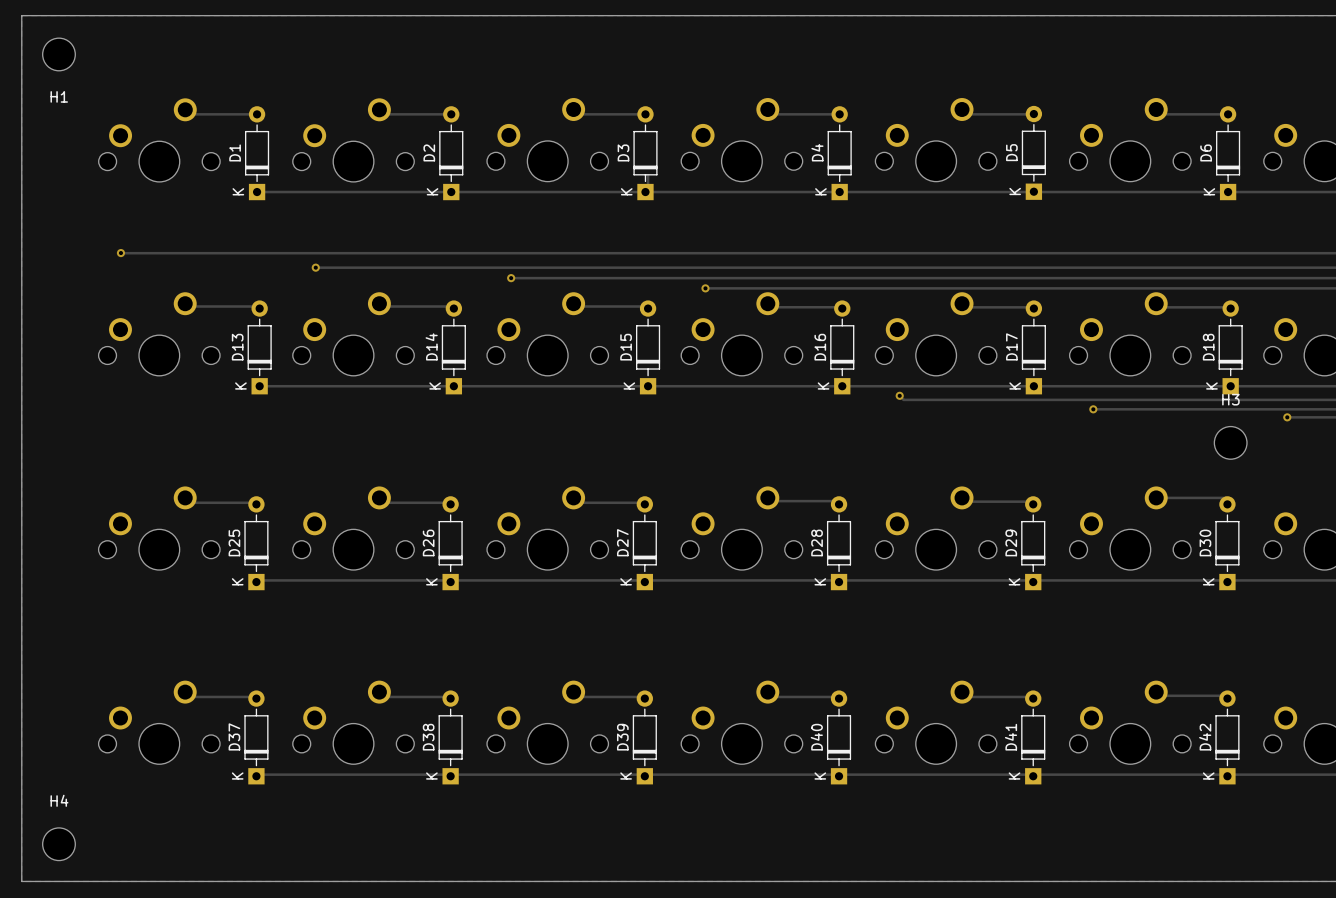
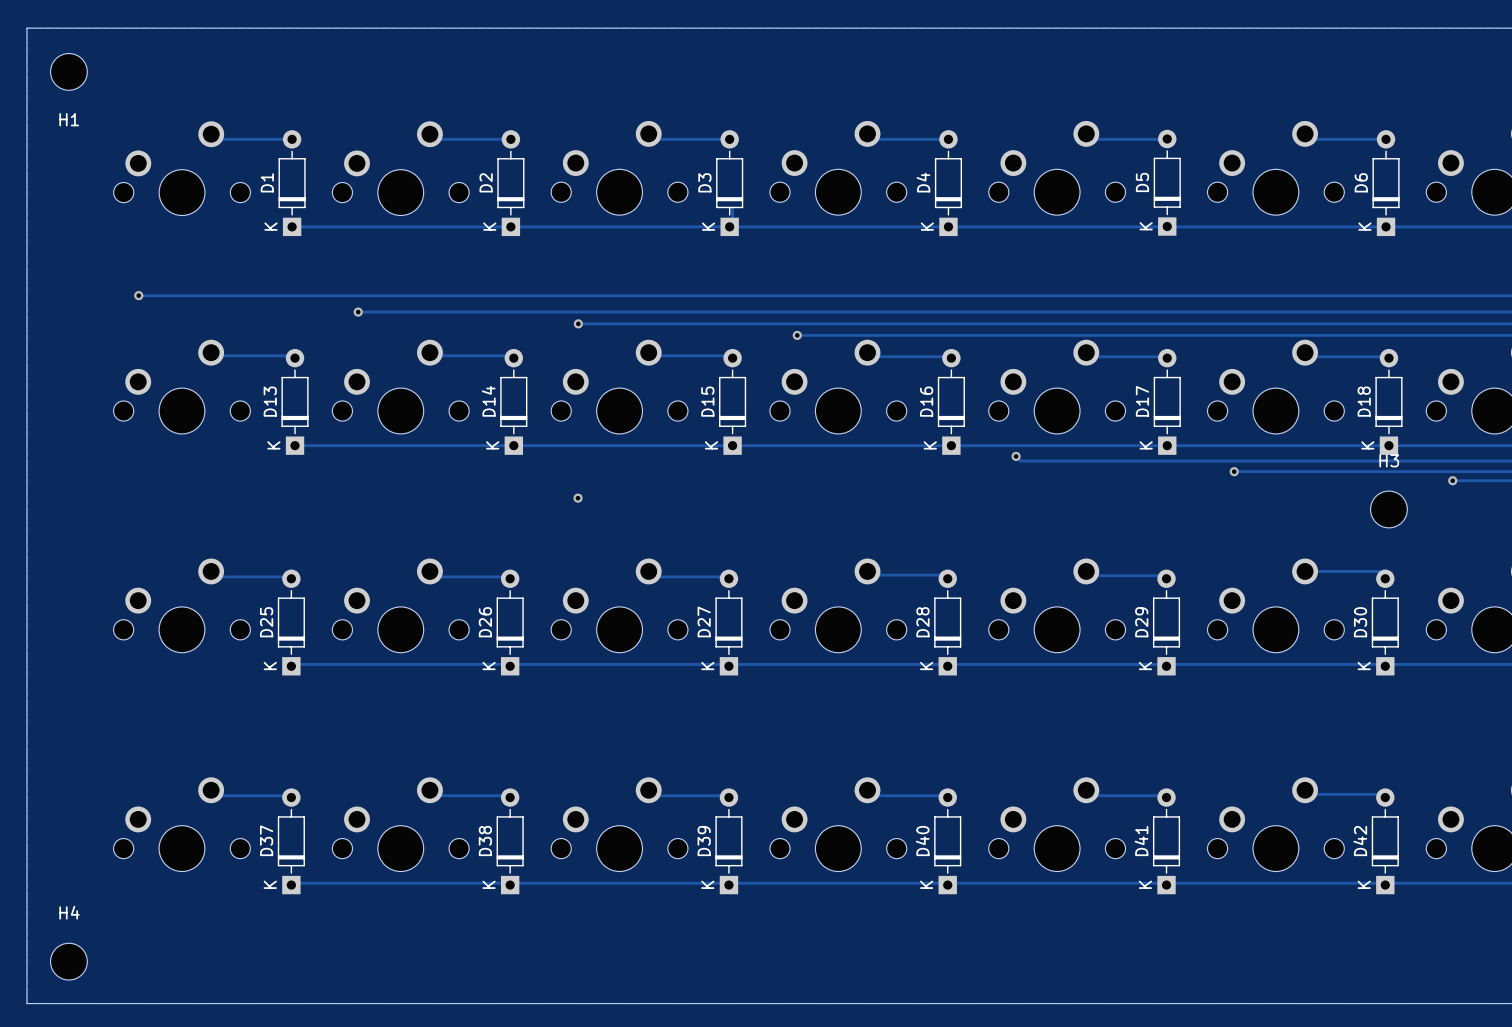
via: none -> (578, 498)

